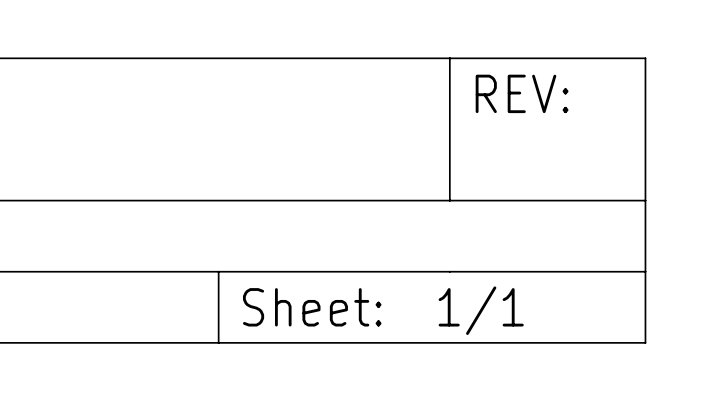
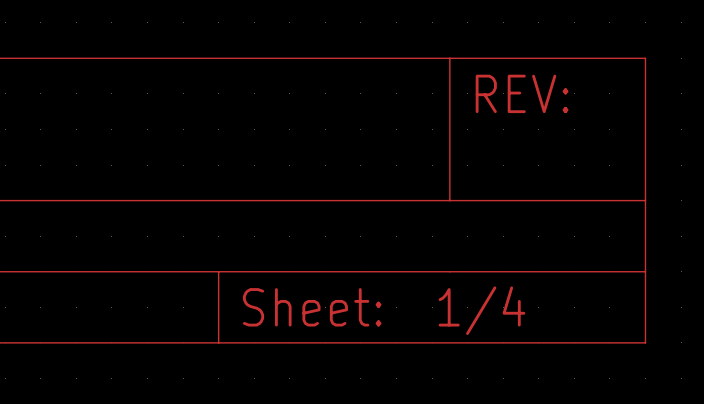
part text: 1/1 (481, 310) -> 1/4 (481, 310)

